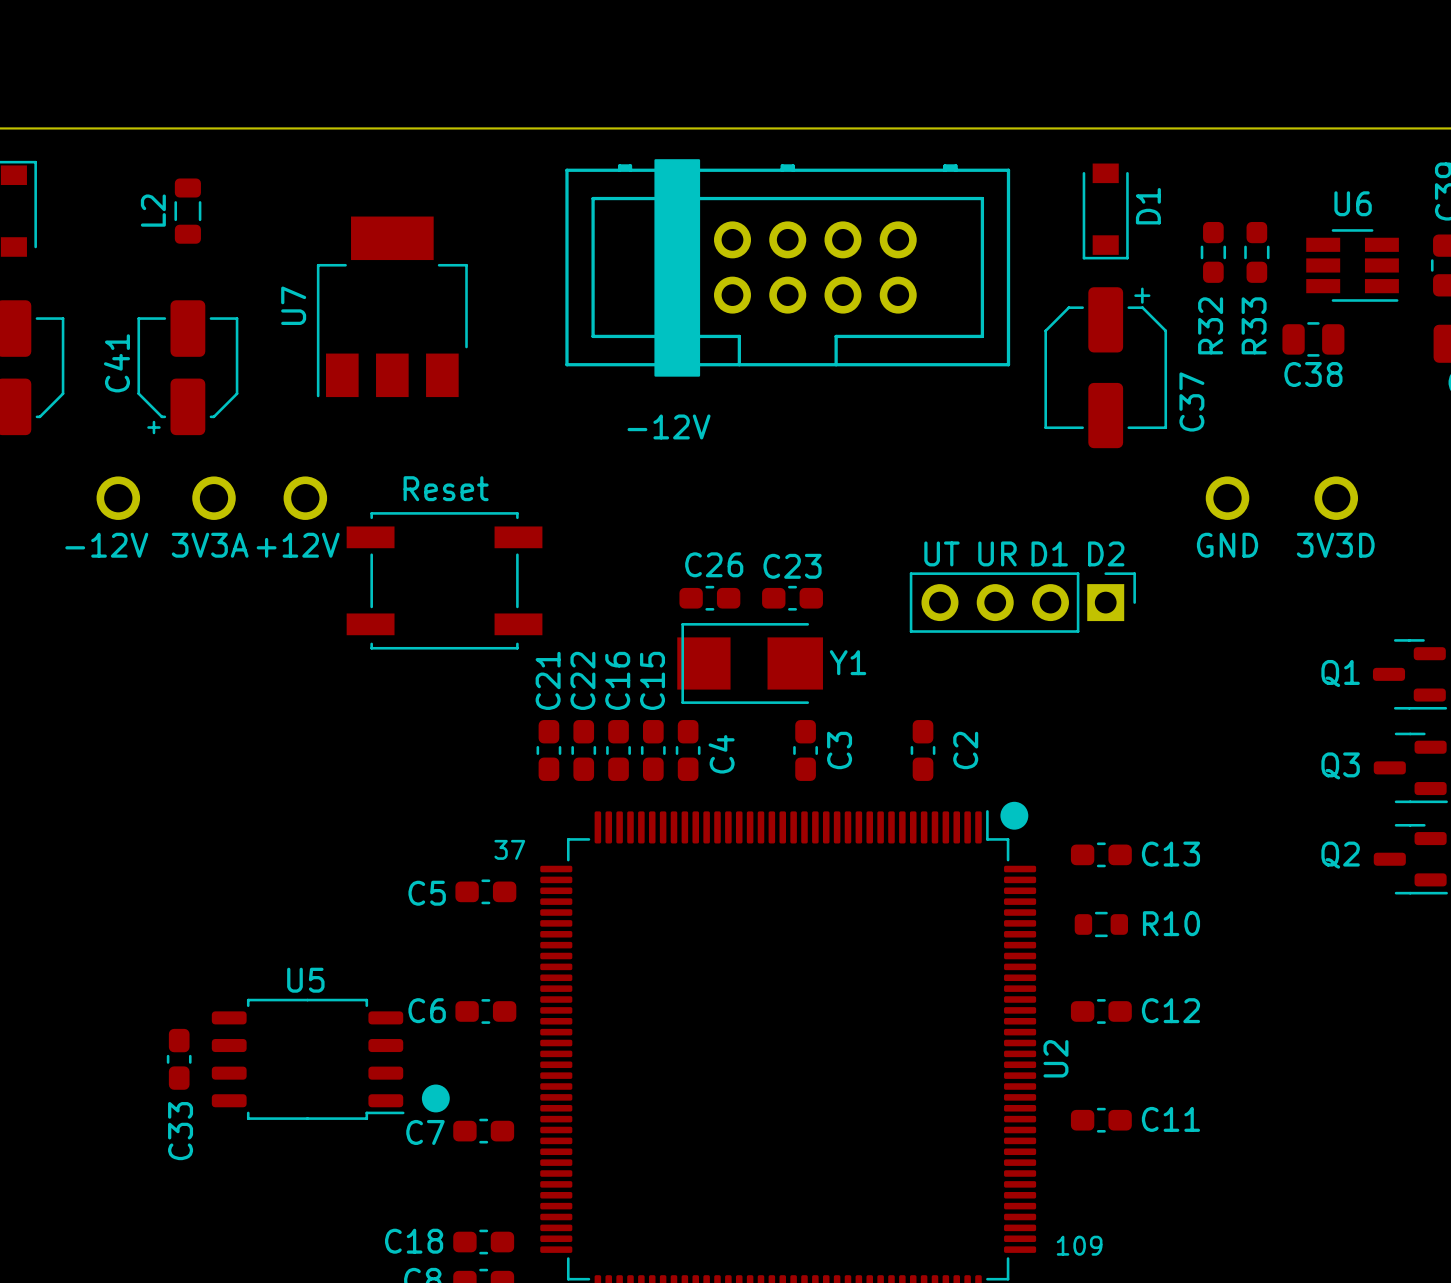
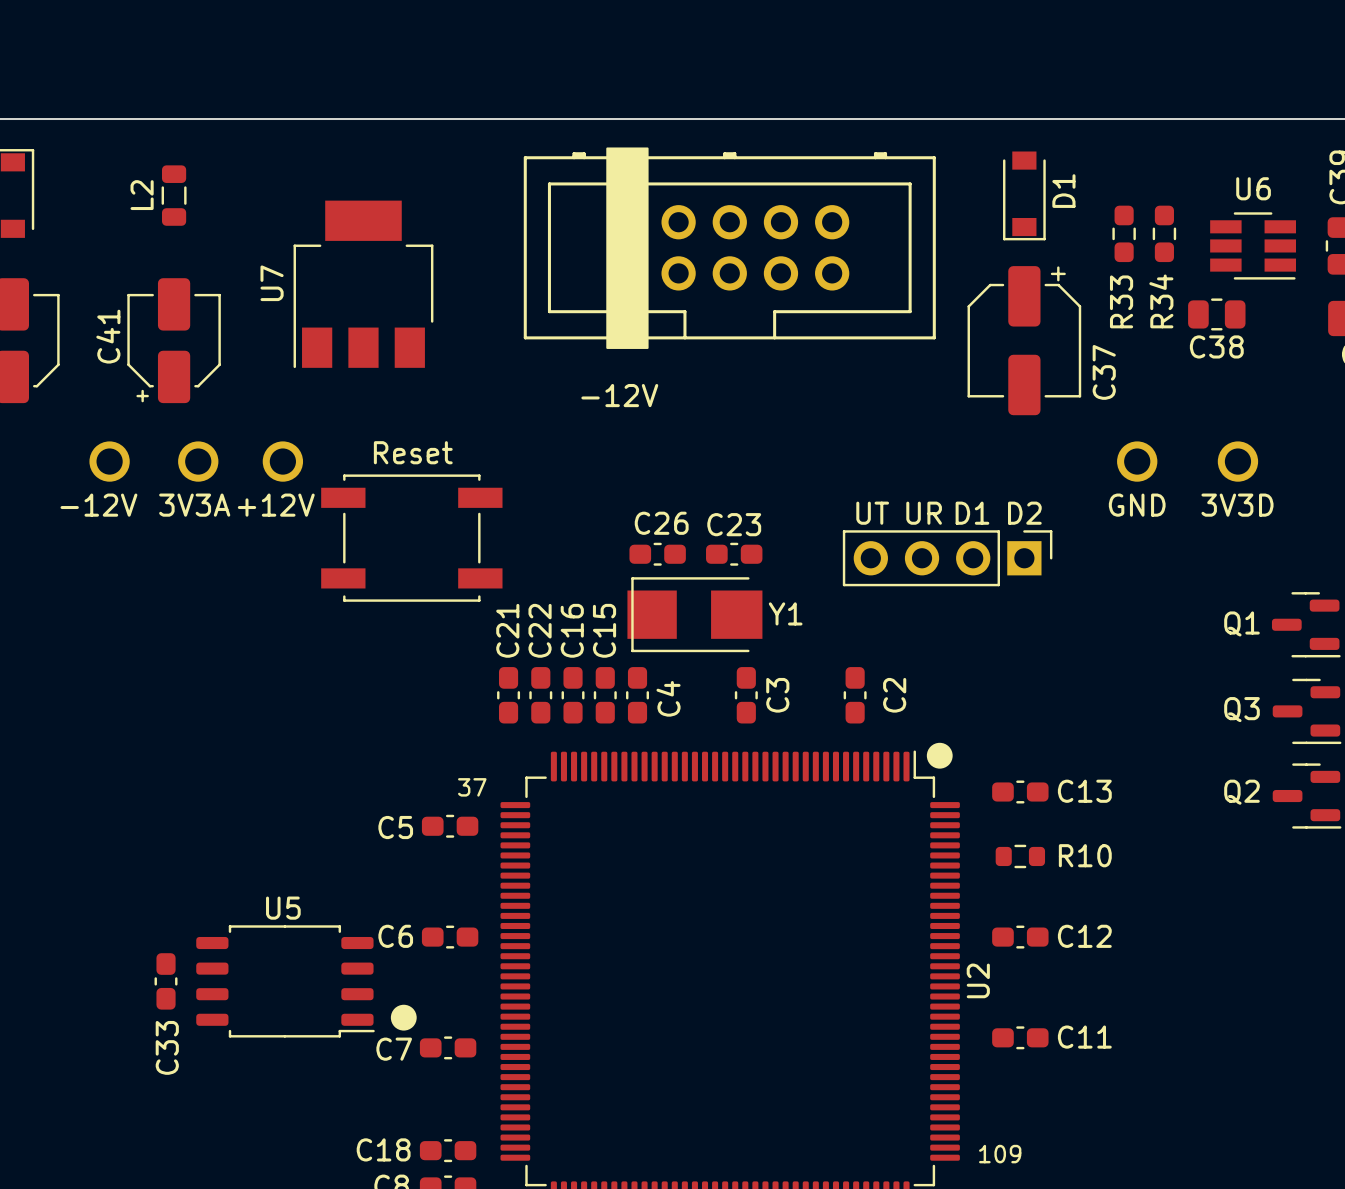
R32 name: R32 (1210, 325) -> R33 (1121, 301)
R33 name: R33 (1254, 325) -> R34 (1161, 301)

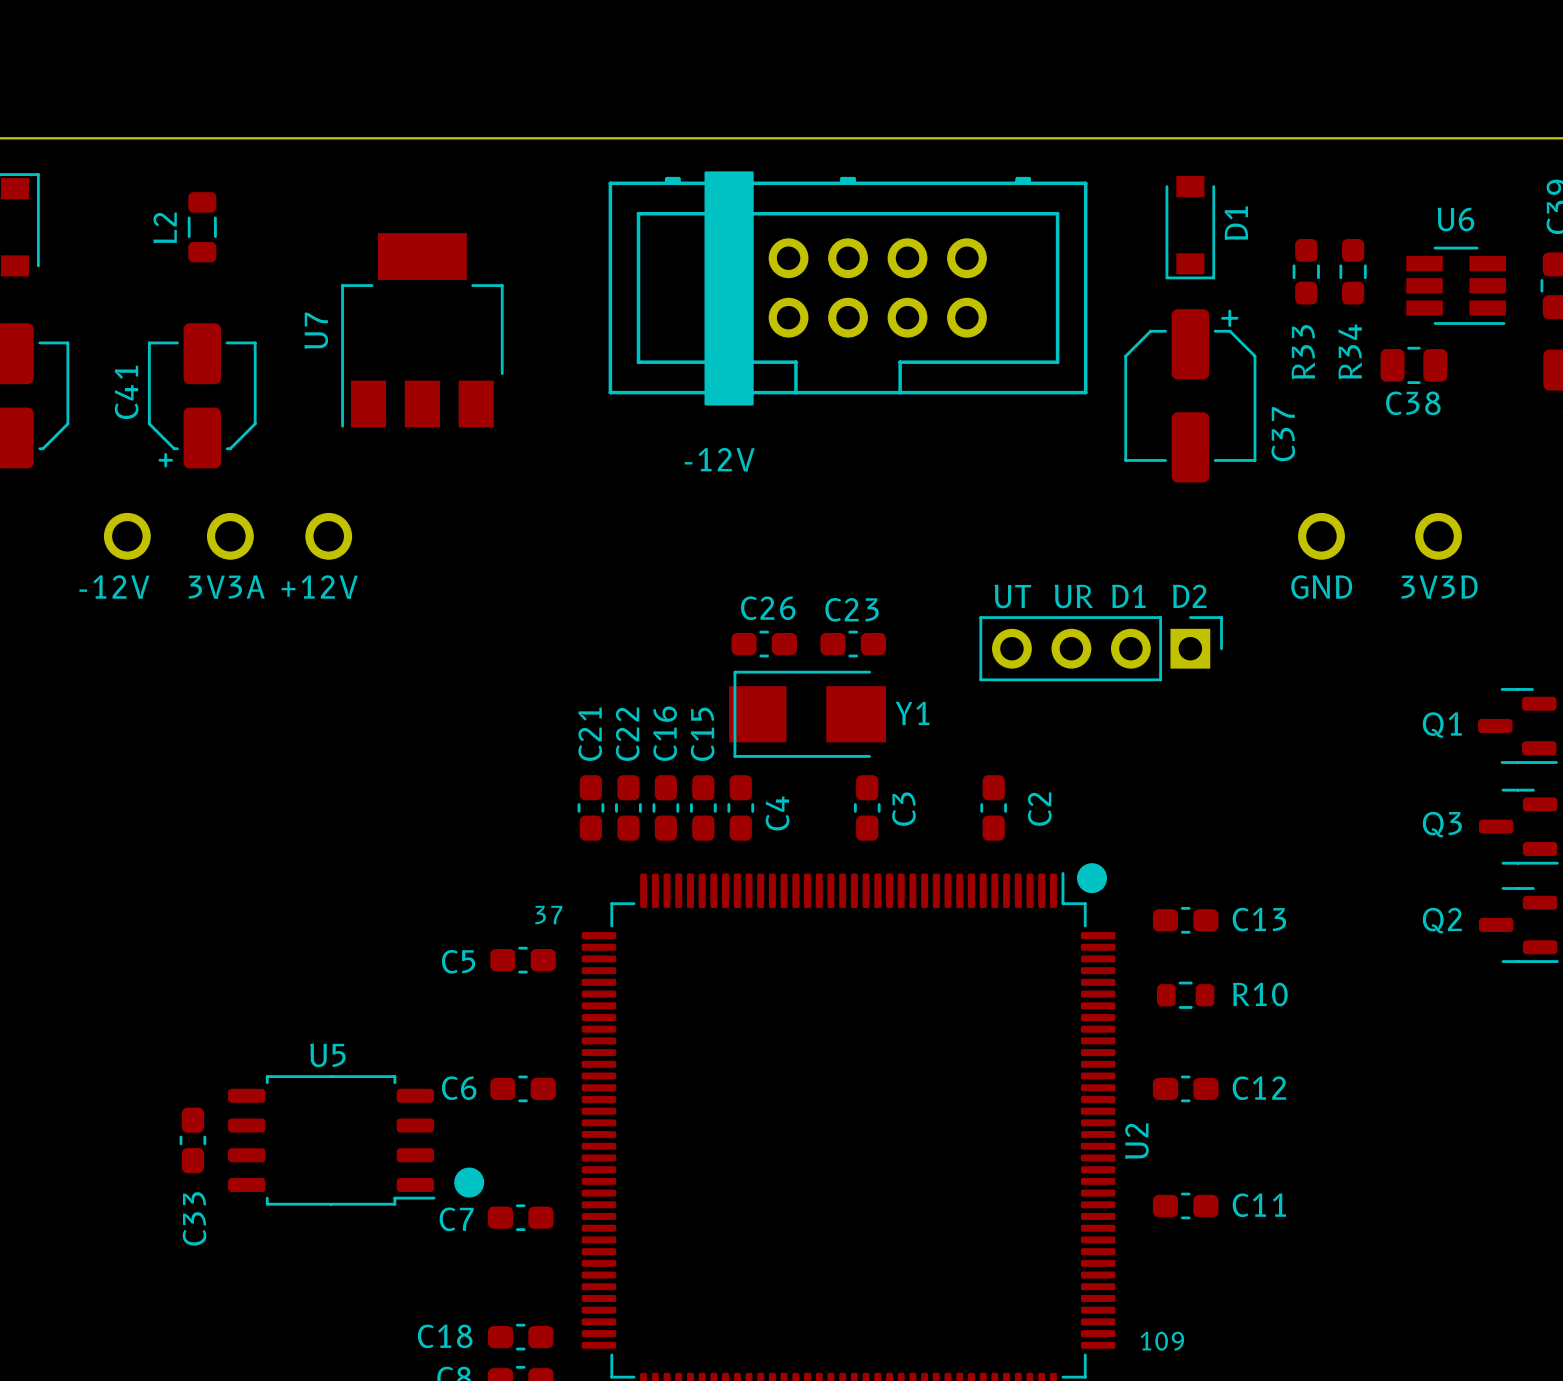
text: Reset (413, 452) -> none
part: (411, 538) -> none

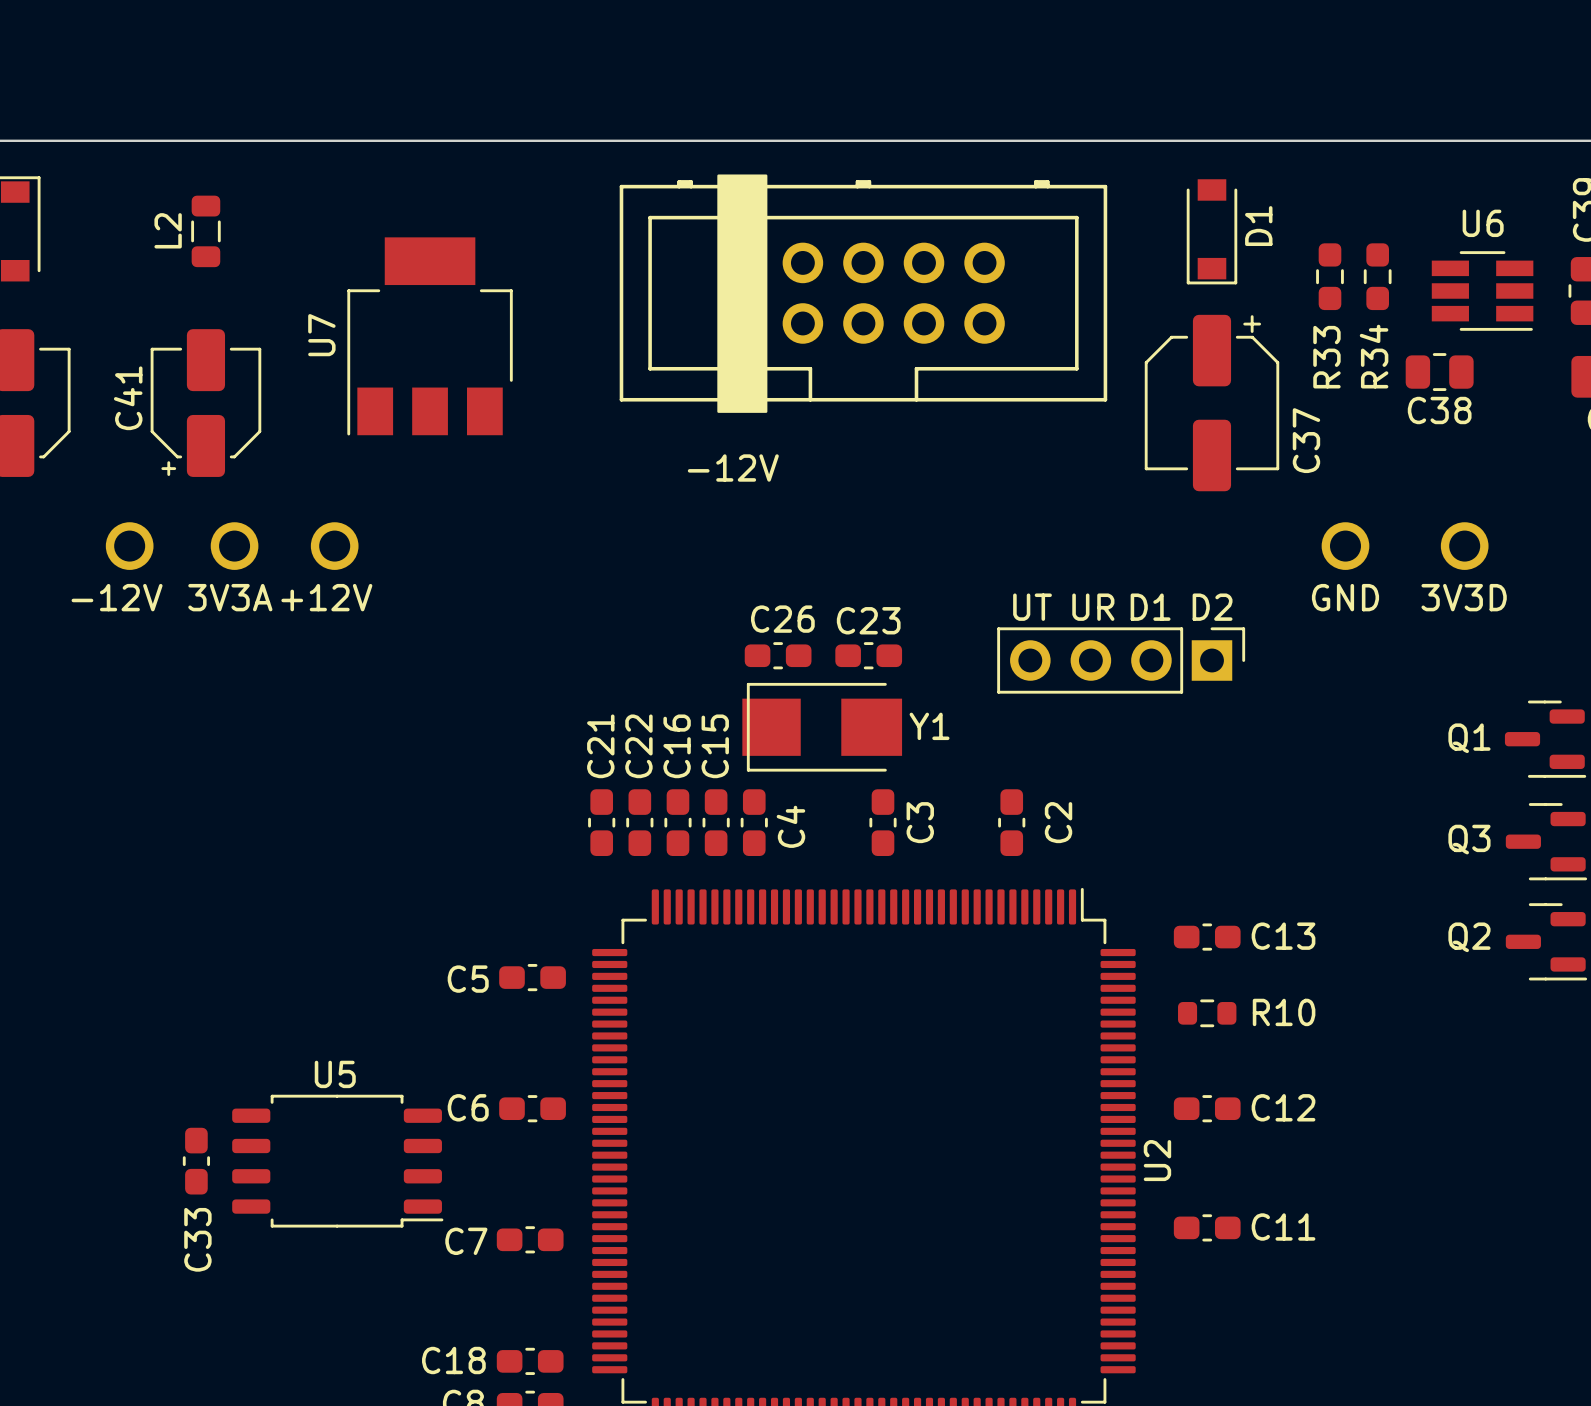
drawing: [1077, 863, 1108, 894] -> none
text: 37 (548, 915) -> none
drawing: [454, 1167, 485, 1198] -> none
text: 109 (1162, 1341) -> none

